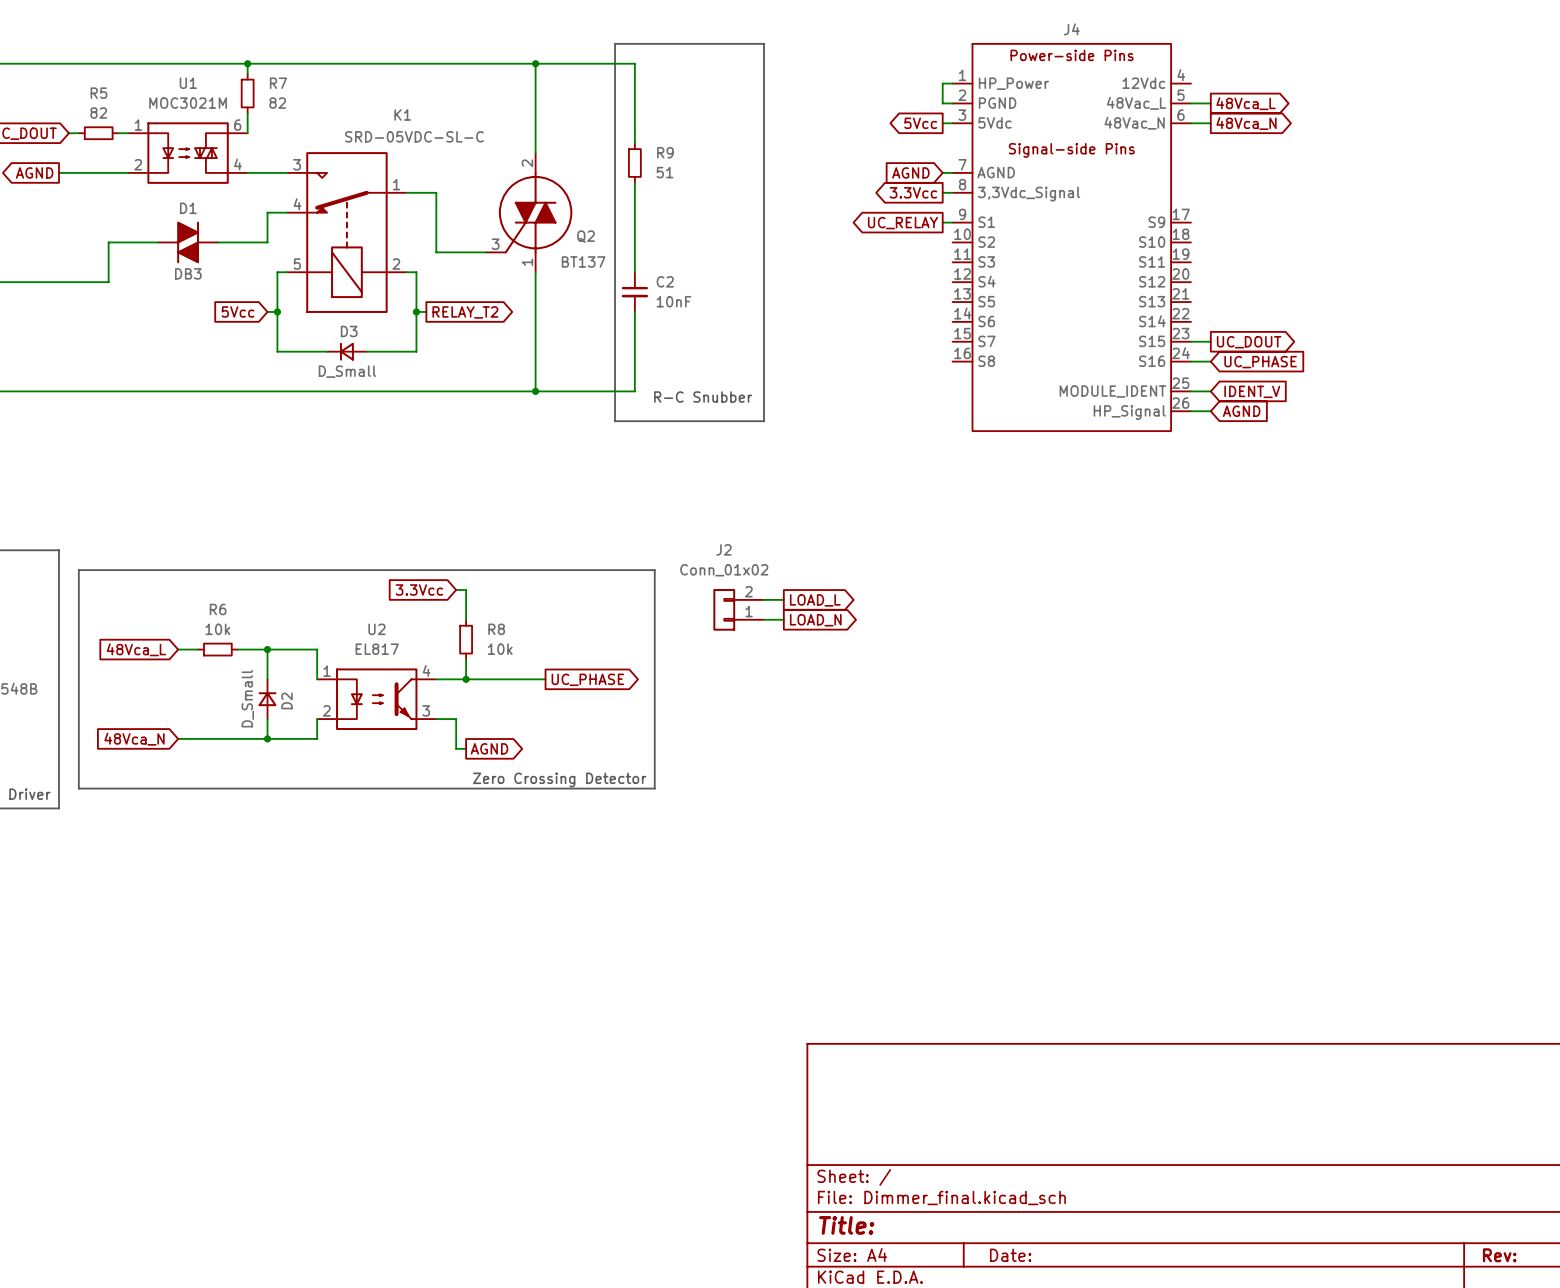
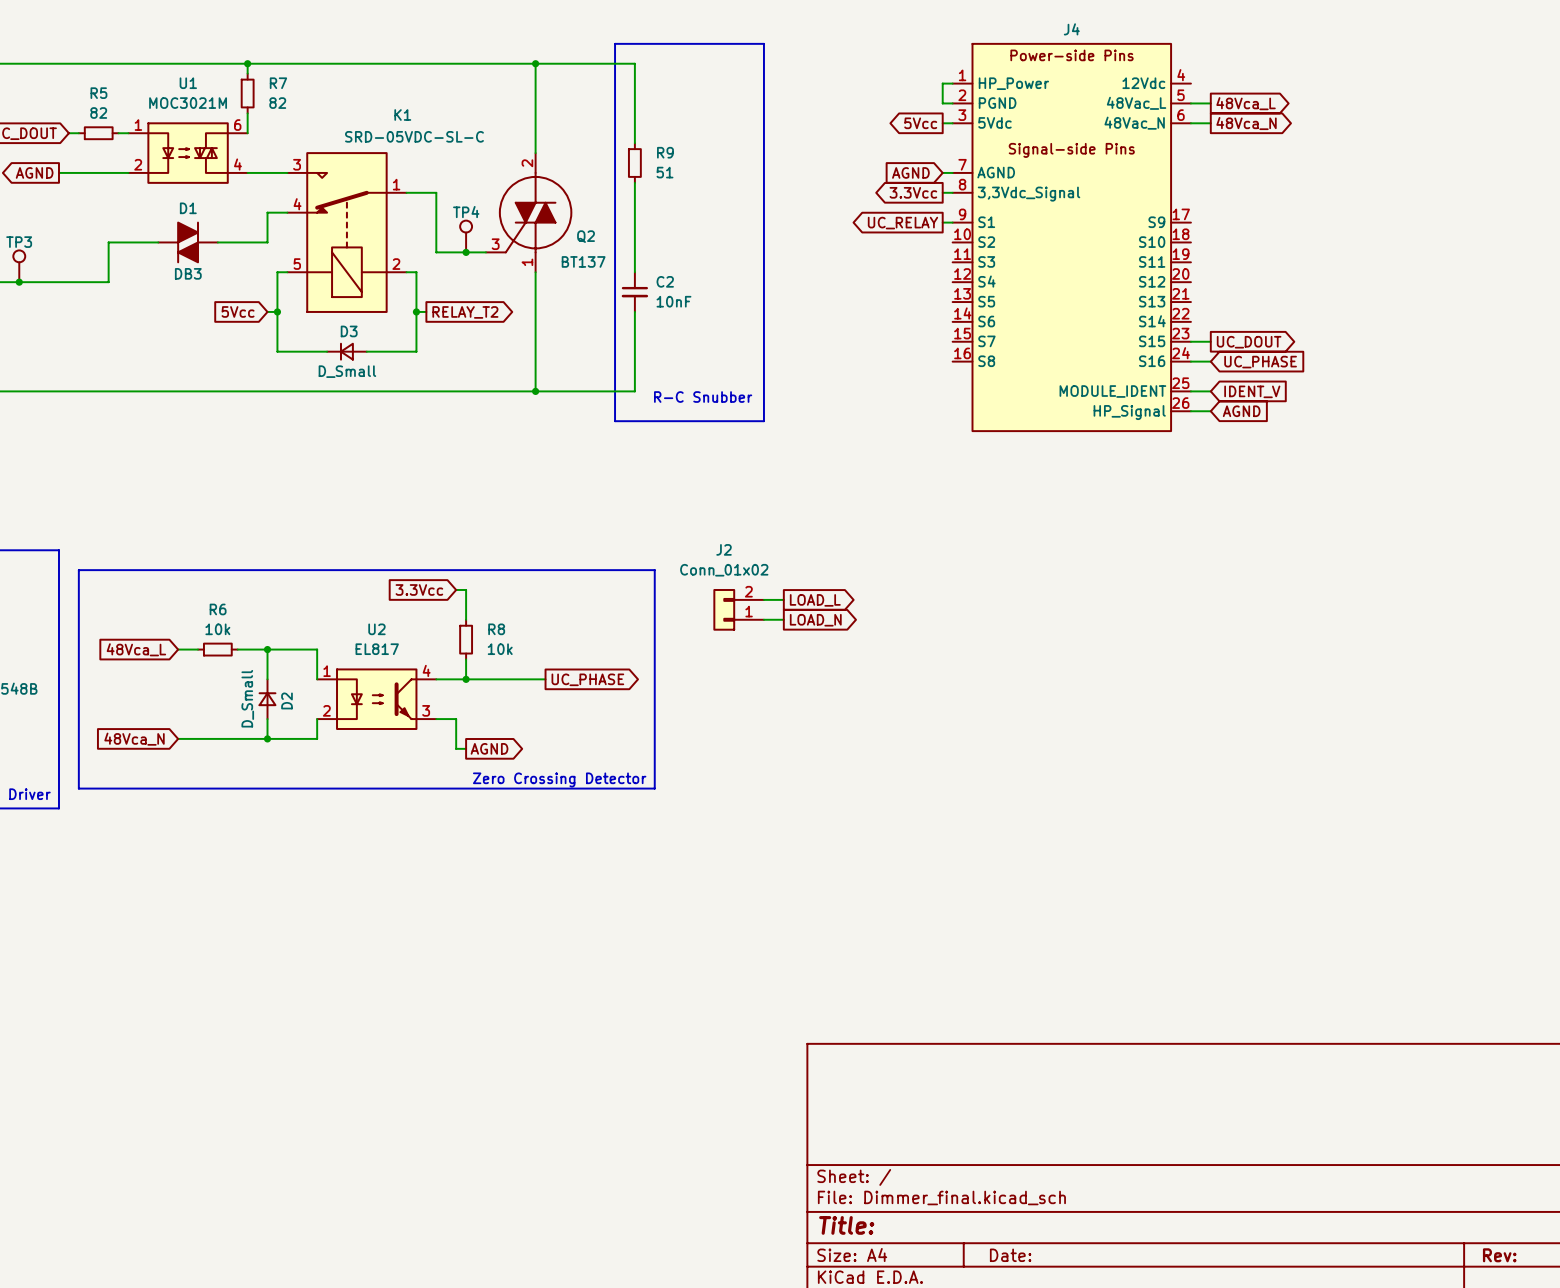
TP4: none -> (466, 236)
junction: none -> (466, 252)
TP3: none -> (19, 266)
junction: none -> (19, 282)

